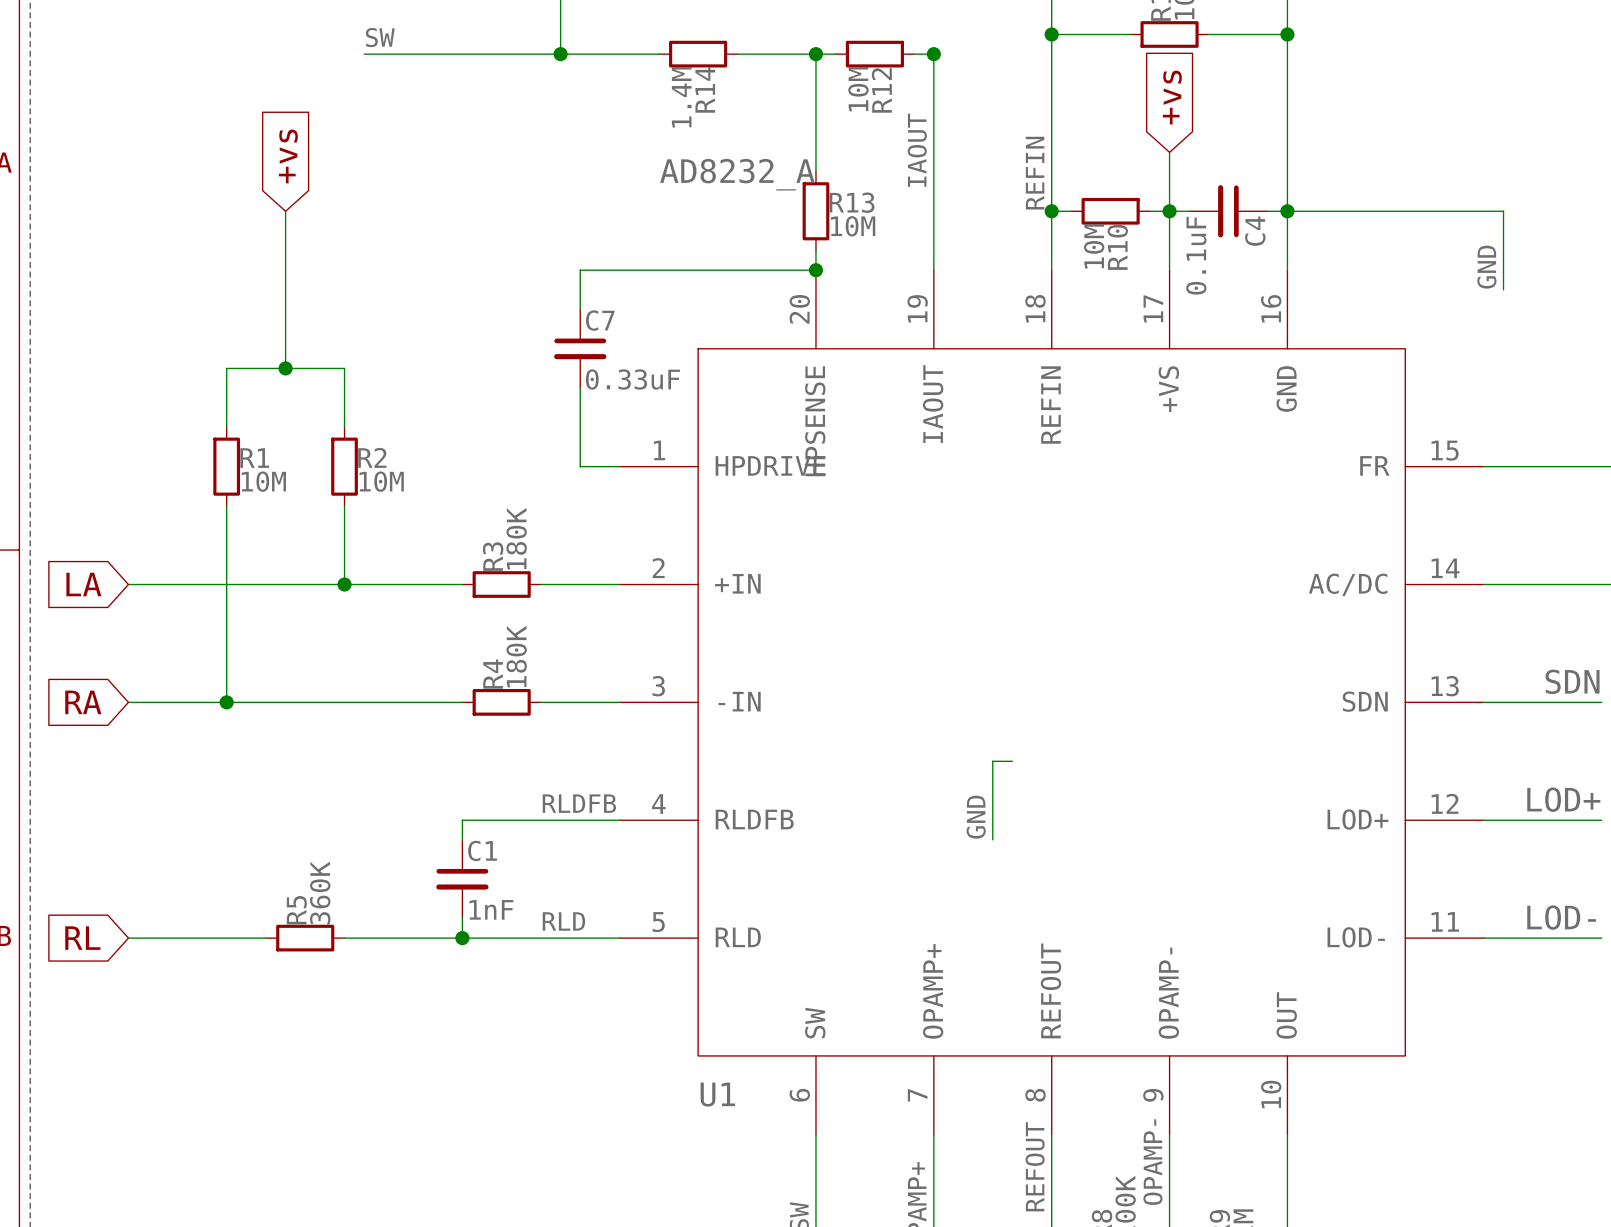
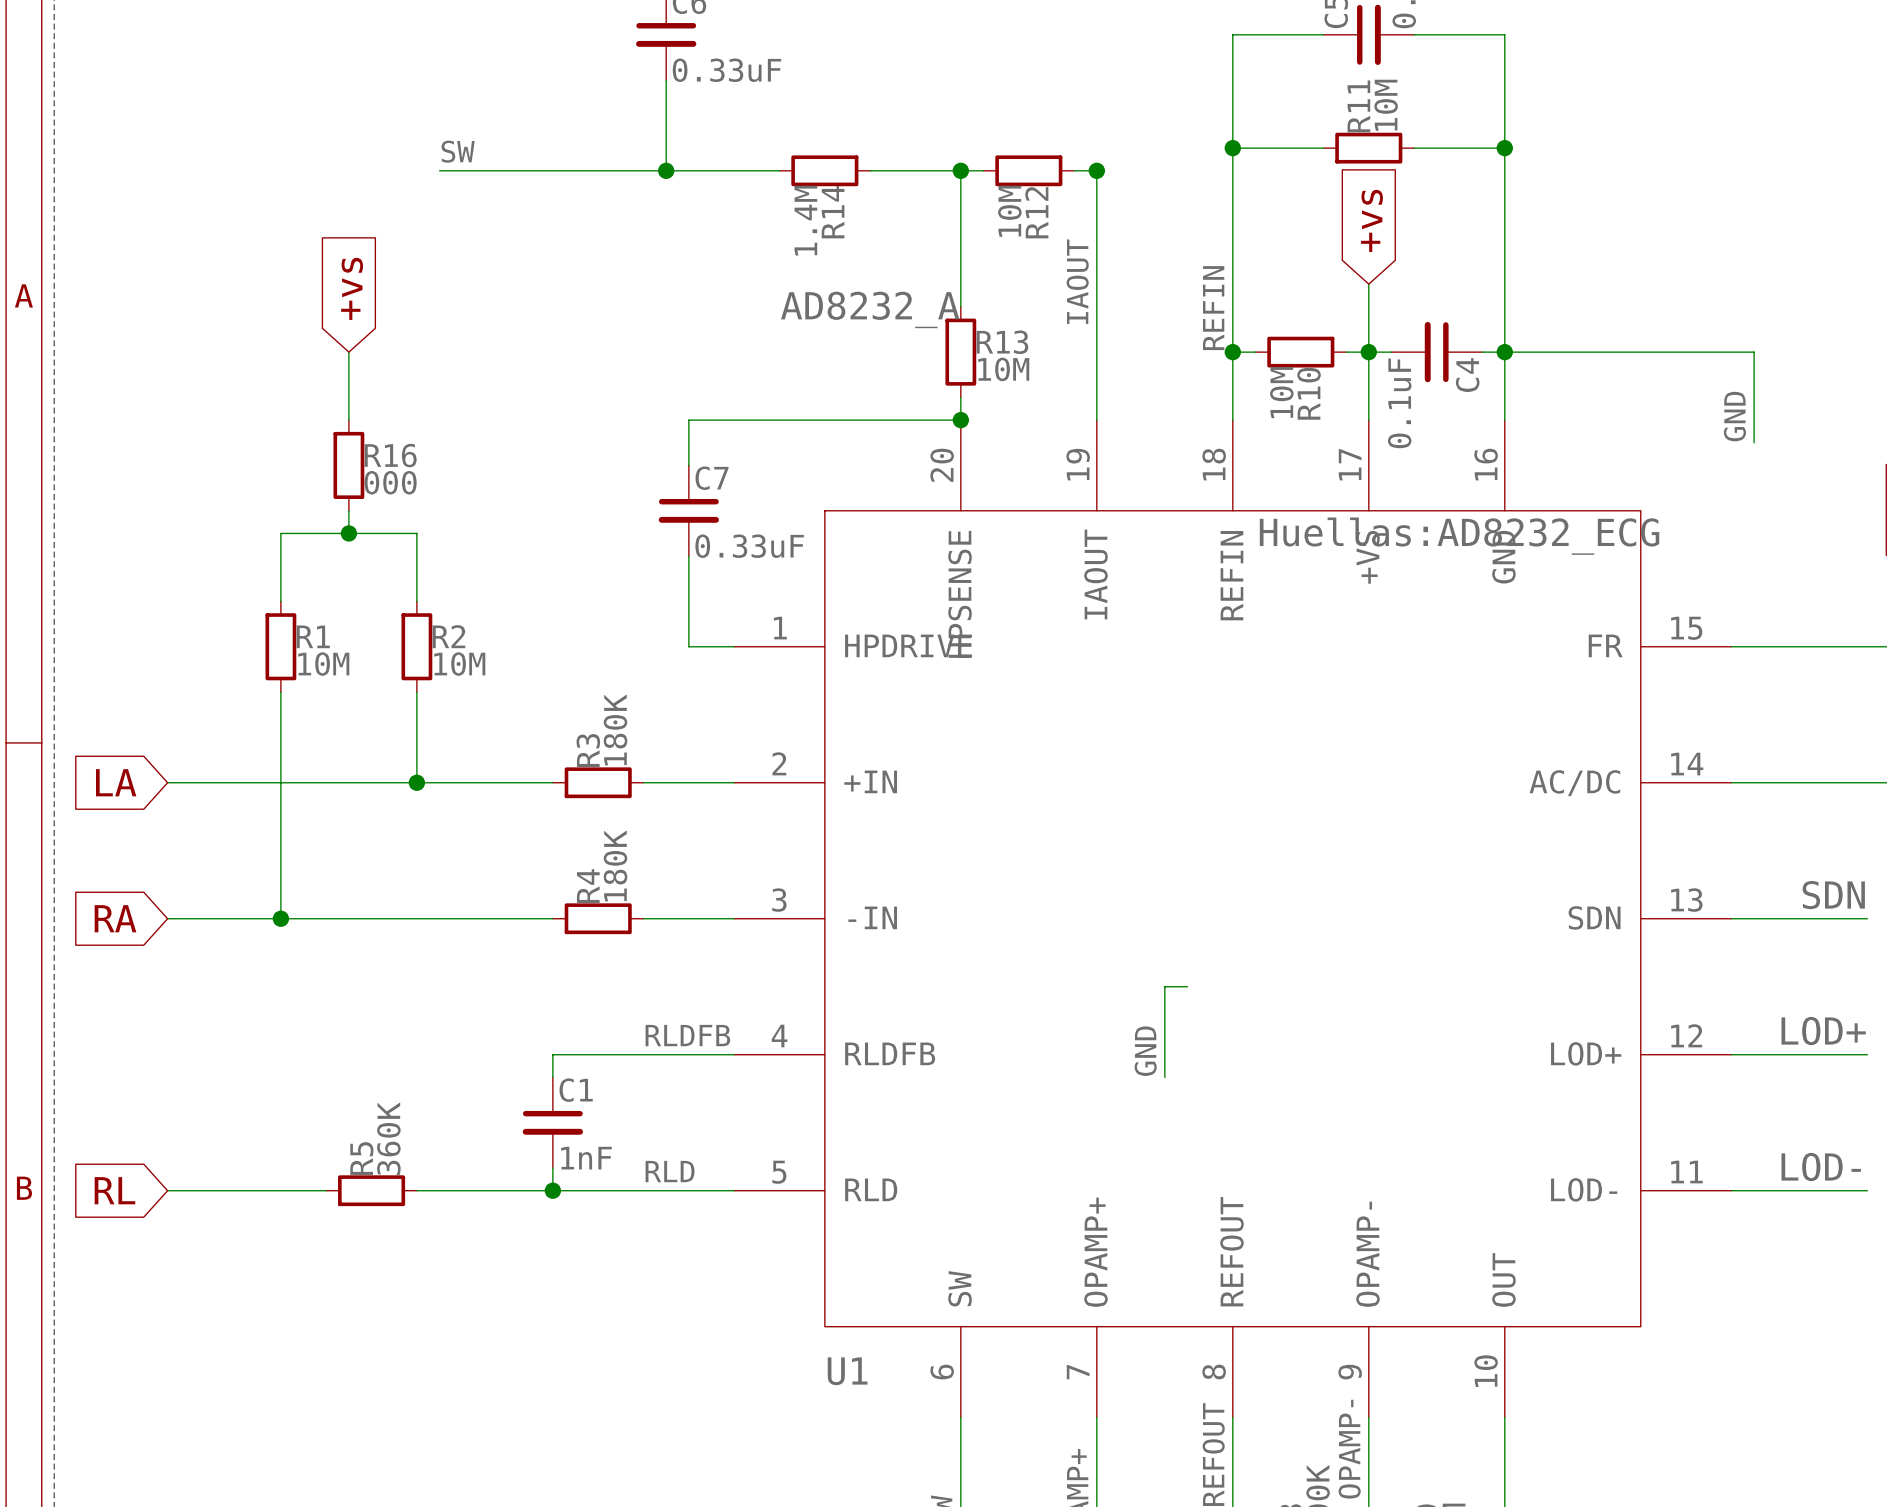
wire: (285, 270) (285, 348) -> none
R16: none -> 000 (348, 465)
U1 text: none -> Huellas:AD8232_ECG (1459, 536)

